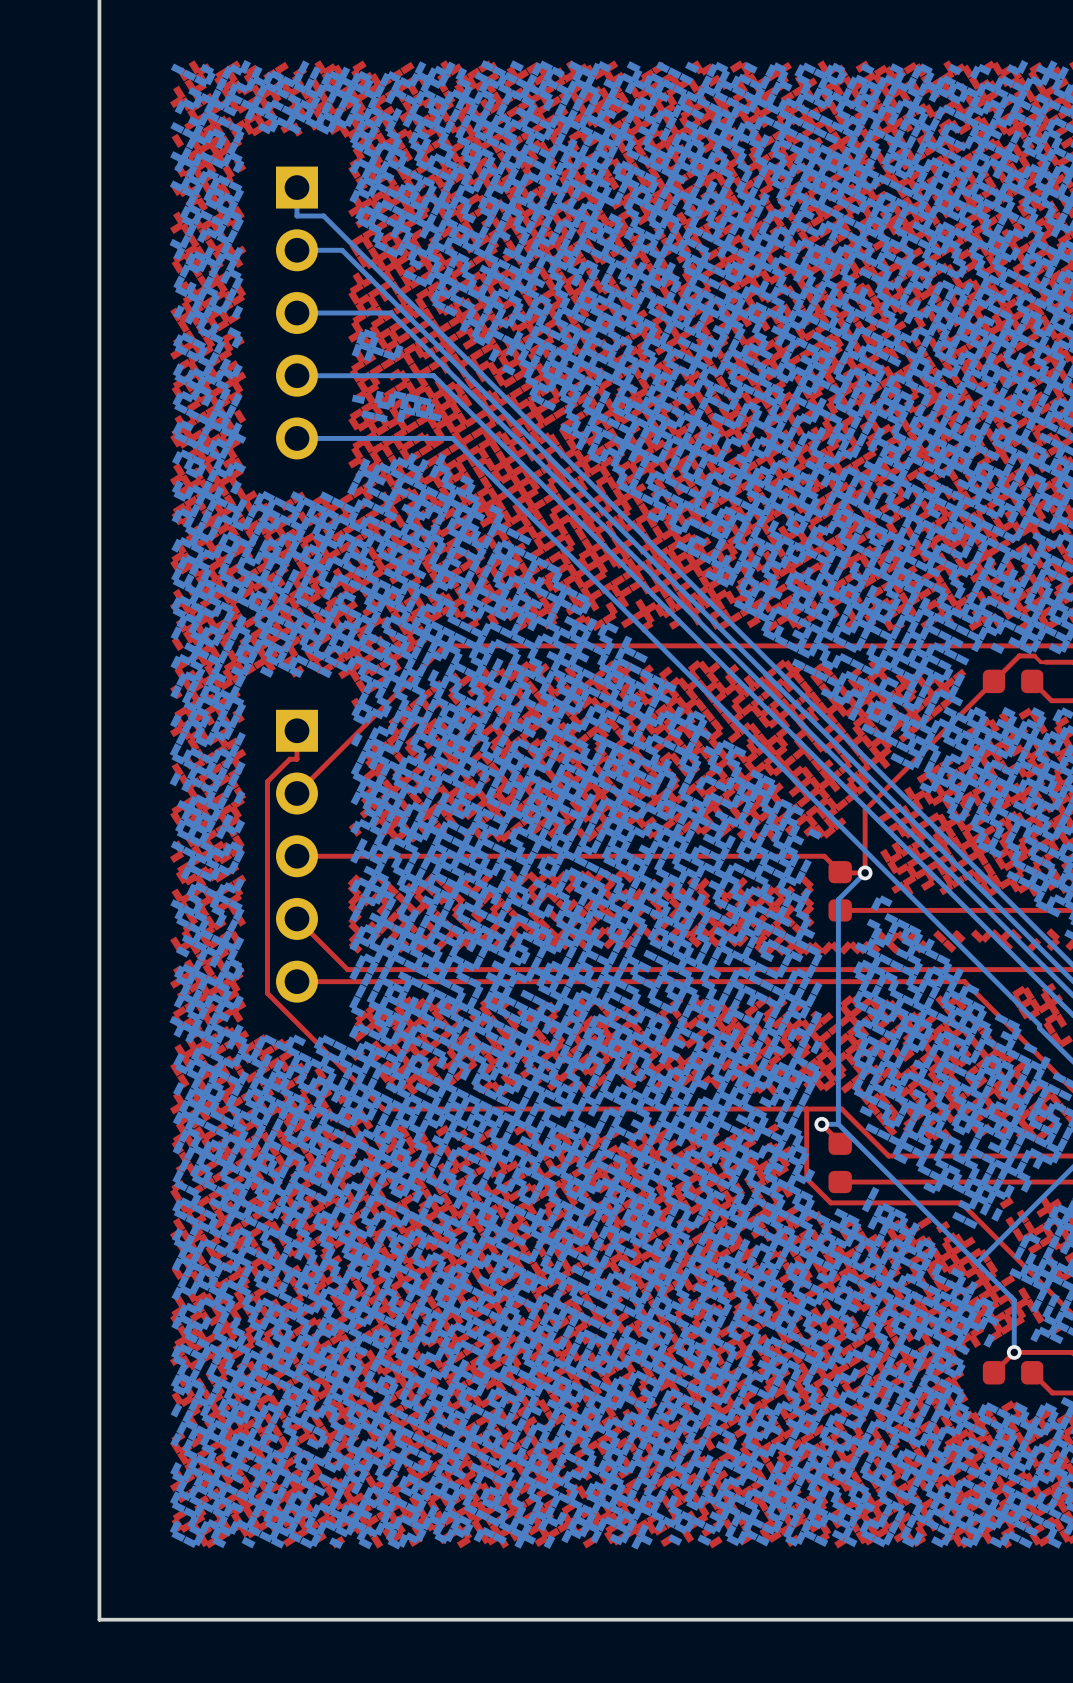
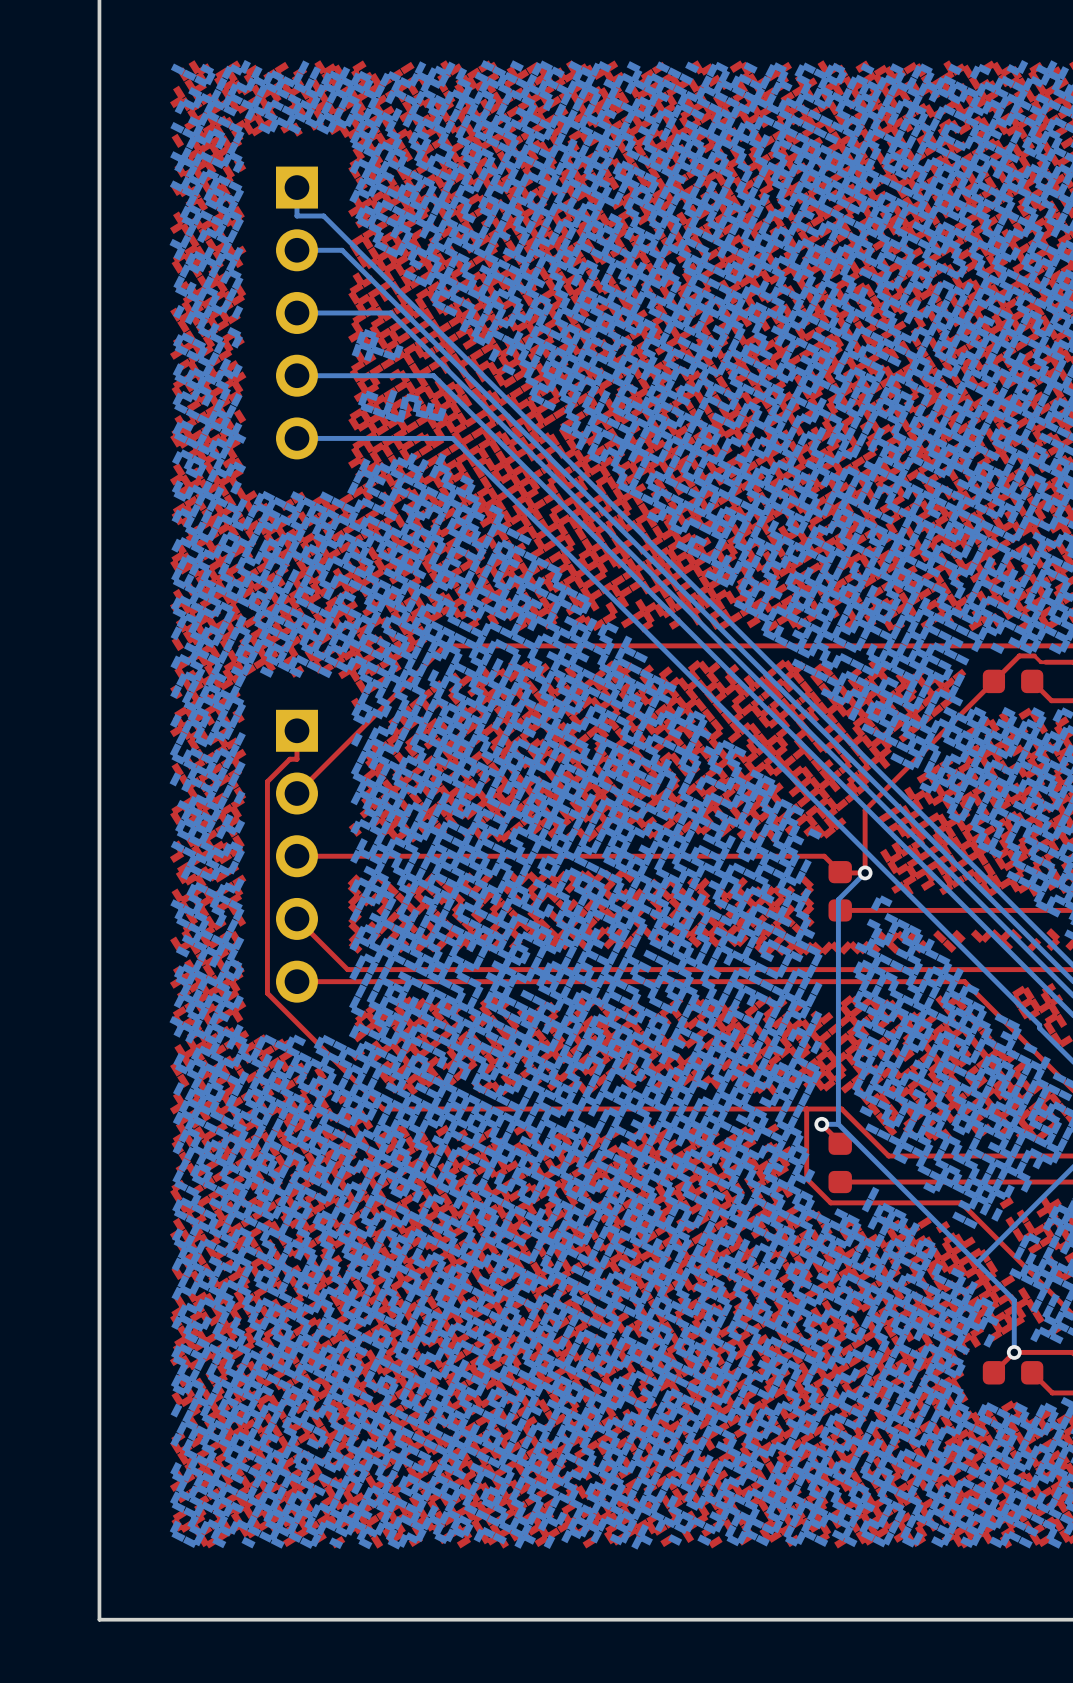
drawing: none -> [360, 389, 399, 423]
drawing: [361, 390, 432, 423] -> none
drawing shape: [351, 394, 366, 405] -> [357, 392, 369, 407]
drawing: none -> [436, 407, 447, 422]

